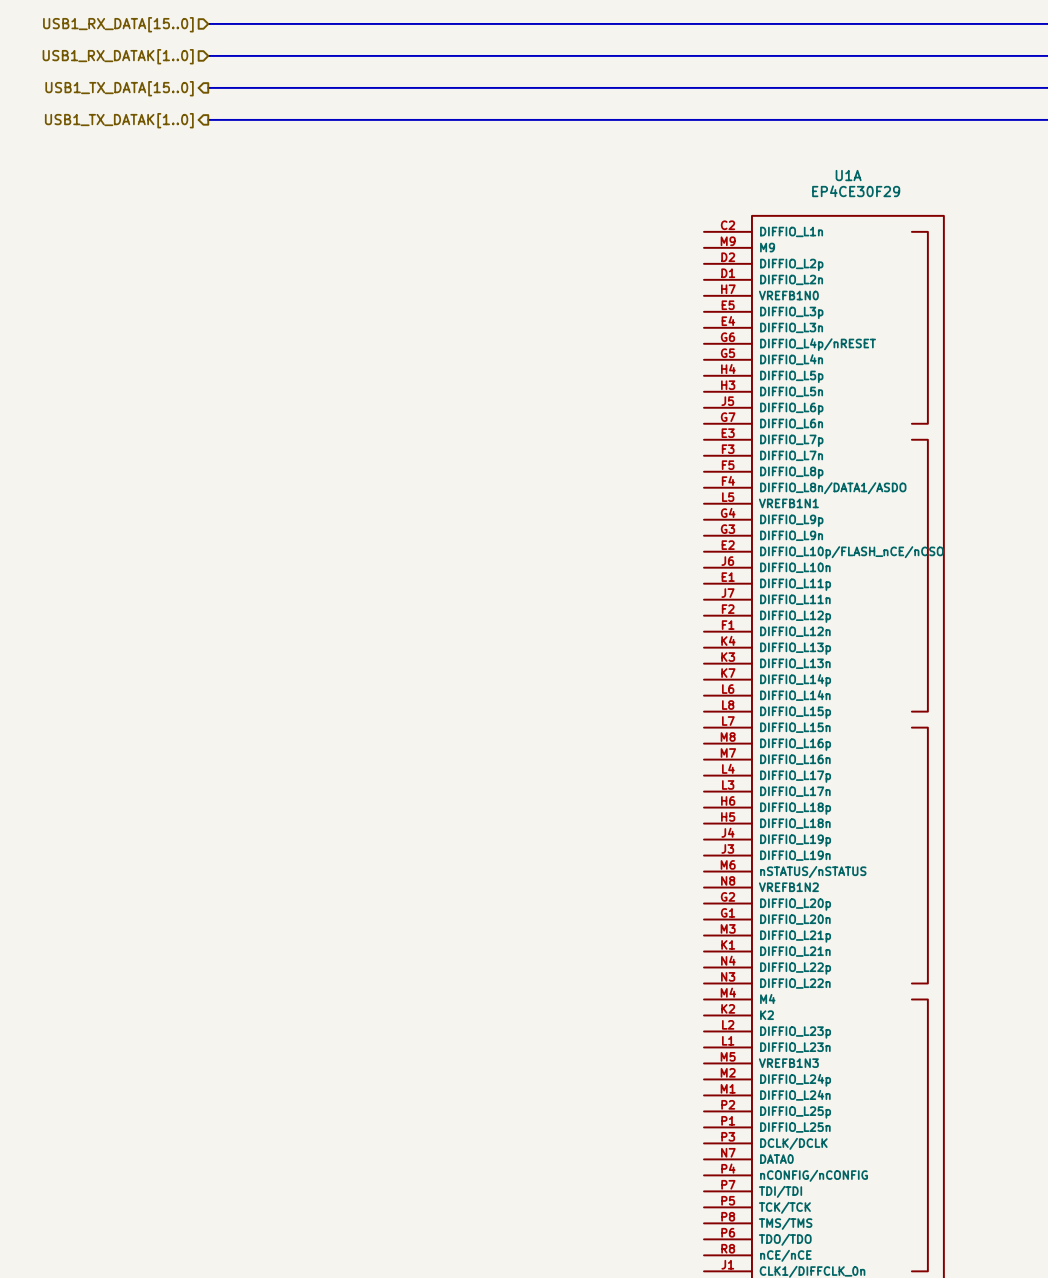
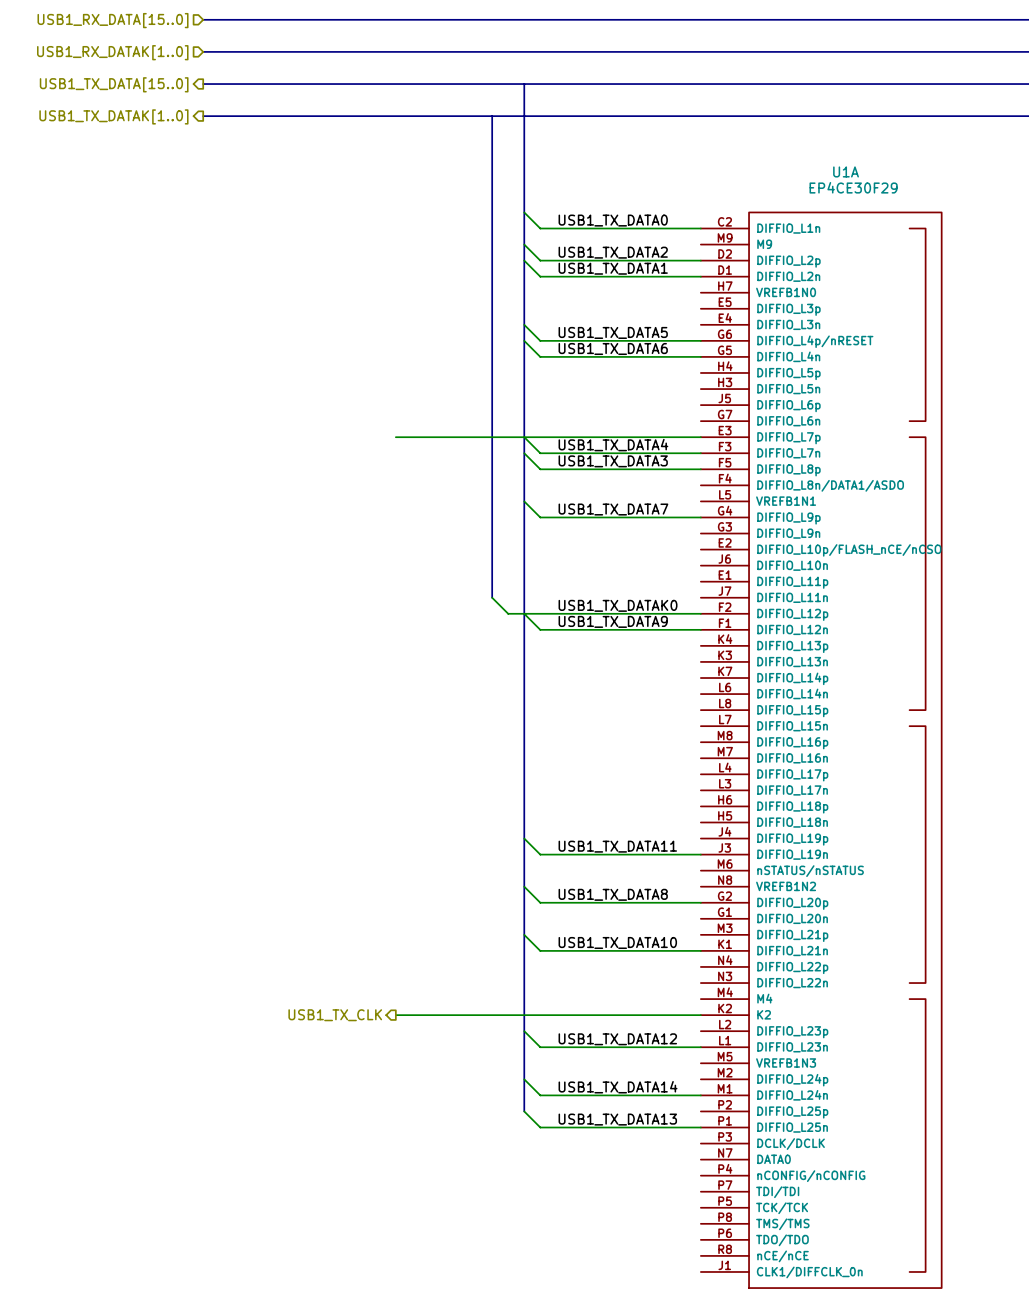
bus: none -> (524, 84) (524, 1111)
bus: none -> (492, 116) (492, 597)
wire: none -> (524, 212) (540, 228) (700, 228)
label: none -> USB1_TX_DATA0 (613, 220)
wire: none -> (524, 244) (540, 260) (700, 260)
label: none -> USB1_TX_DATA2 (613, 252)
wire: none -> (524, 260) (540, 276) (700, 276)
label: none -> USB1_TX_DATA1 (613, 268)
wire: none -> (524, 324) (540, 340) (700, 340)
label: none -> USB1_TX_DATA5 (613, 332)
wire: none -> (524, 340) (540, 356) (700, 356)
label: none -> USB1_TX_DATA6 (613, 348)
wire: none -> (395, 437) (700, 437)
wire: none -> (524, 437) (540, 453) (700, 453)
label: none -> USB1_TX_DATA4 (613, 445)
wire: none -> (524, 453) (540, 469) (700, 469)
label: none -> USB1_TX_DATA3 (613, 461)
wire: none -> (524, 501) (540, 517) (700, 517)
label: none -> USB1_TX_DATA7 (613, 509)
wire: none -> (492, 597) (508, 613) (700, 613)
label: none -> USB1_TX_DATAK0 (618, 605)
wire: none -> (524, 613) (540, 629) (700, 629)
label: none -> USB1_TX_DATA9 (613, 621)
wire: none -> (524, 838) (540, 854) (700, 854)
label: none -> USB1_TX_DATA11 (617, 846)
wire: none -> (524, 886) (540, 902) (700, 902)
label: none -> USB1_TX_DATA8 (613, 894)
wire: none -> (524, 934) (540, 950) (700, 950)
label: none -> USB1_TX_DATA10 (617, 942)
hierarchical label: none -> USB1_TX_CLK (335, 1015)
wire: none -> (395, 1015) (700, 1015)
wire: none -> (524, 1031) (540, 1047) (700, 1047)
label: none -> USB1_TX_DATA12 (617, 1039)
wire: none -> (524, 1079) (540, 1095) (700, 1095)
label: none -> USB1_TX_DATA14 (618, 1087)
wire: none -> (524, 1111) (540, 1127) (700, 1127)
label: none -> USB1_TX_DATA13 (617, 1119)

